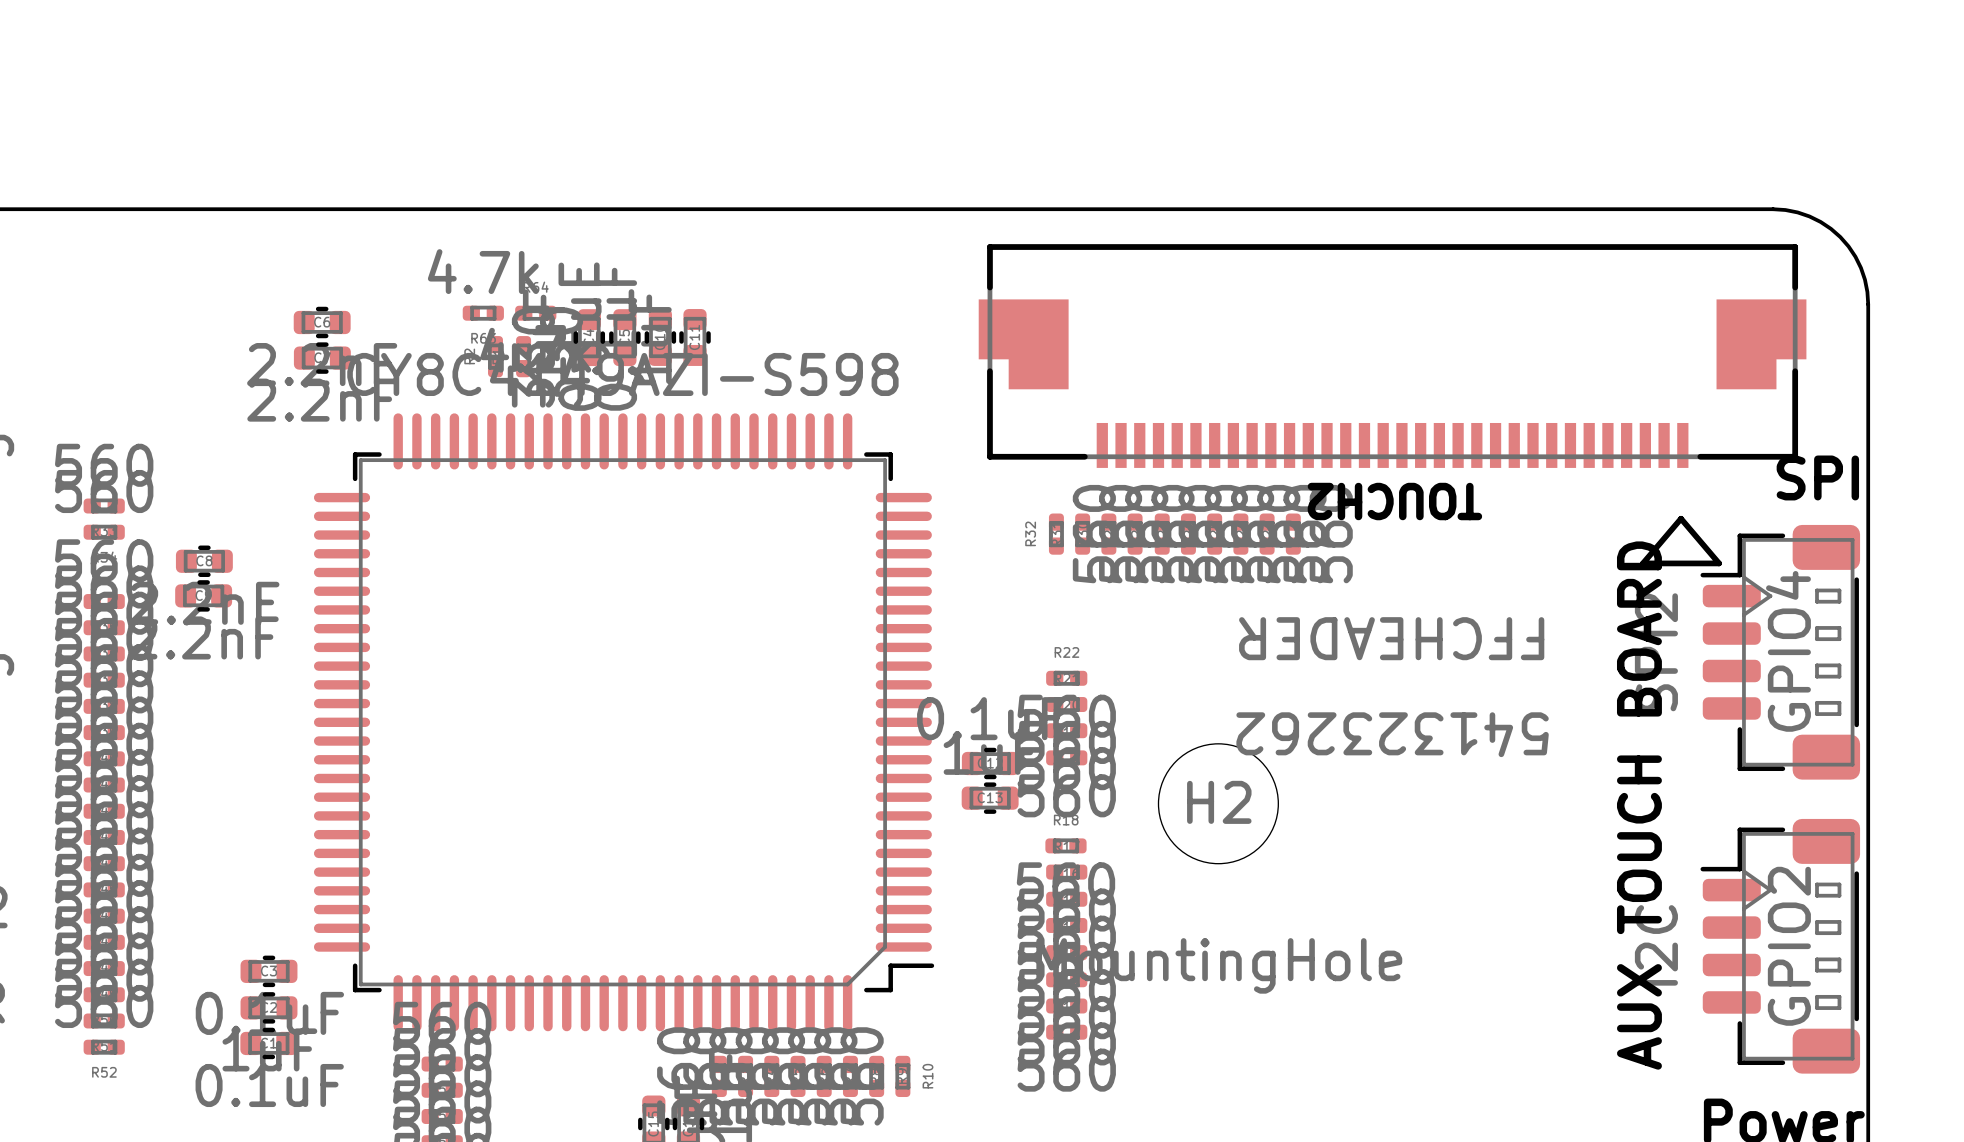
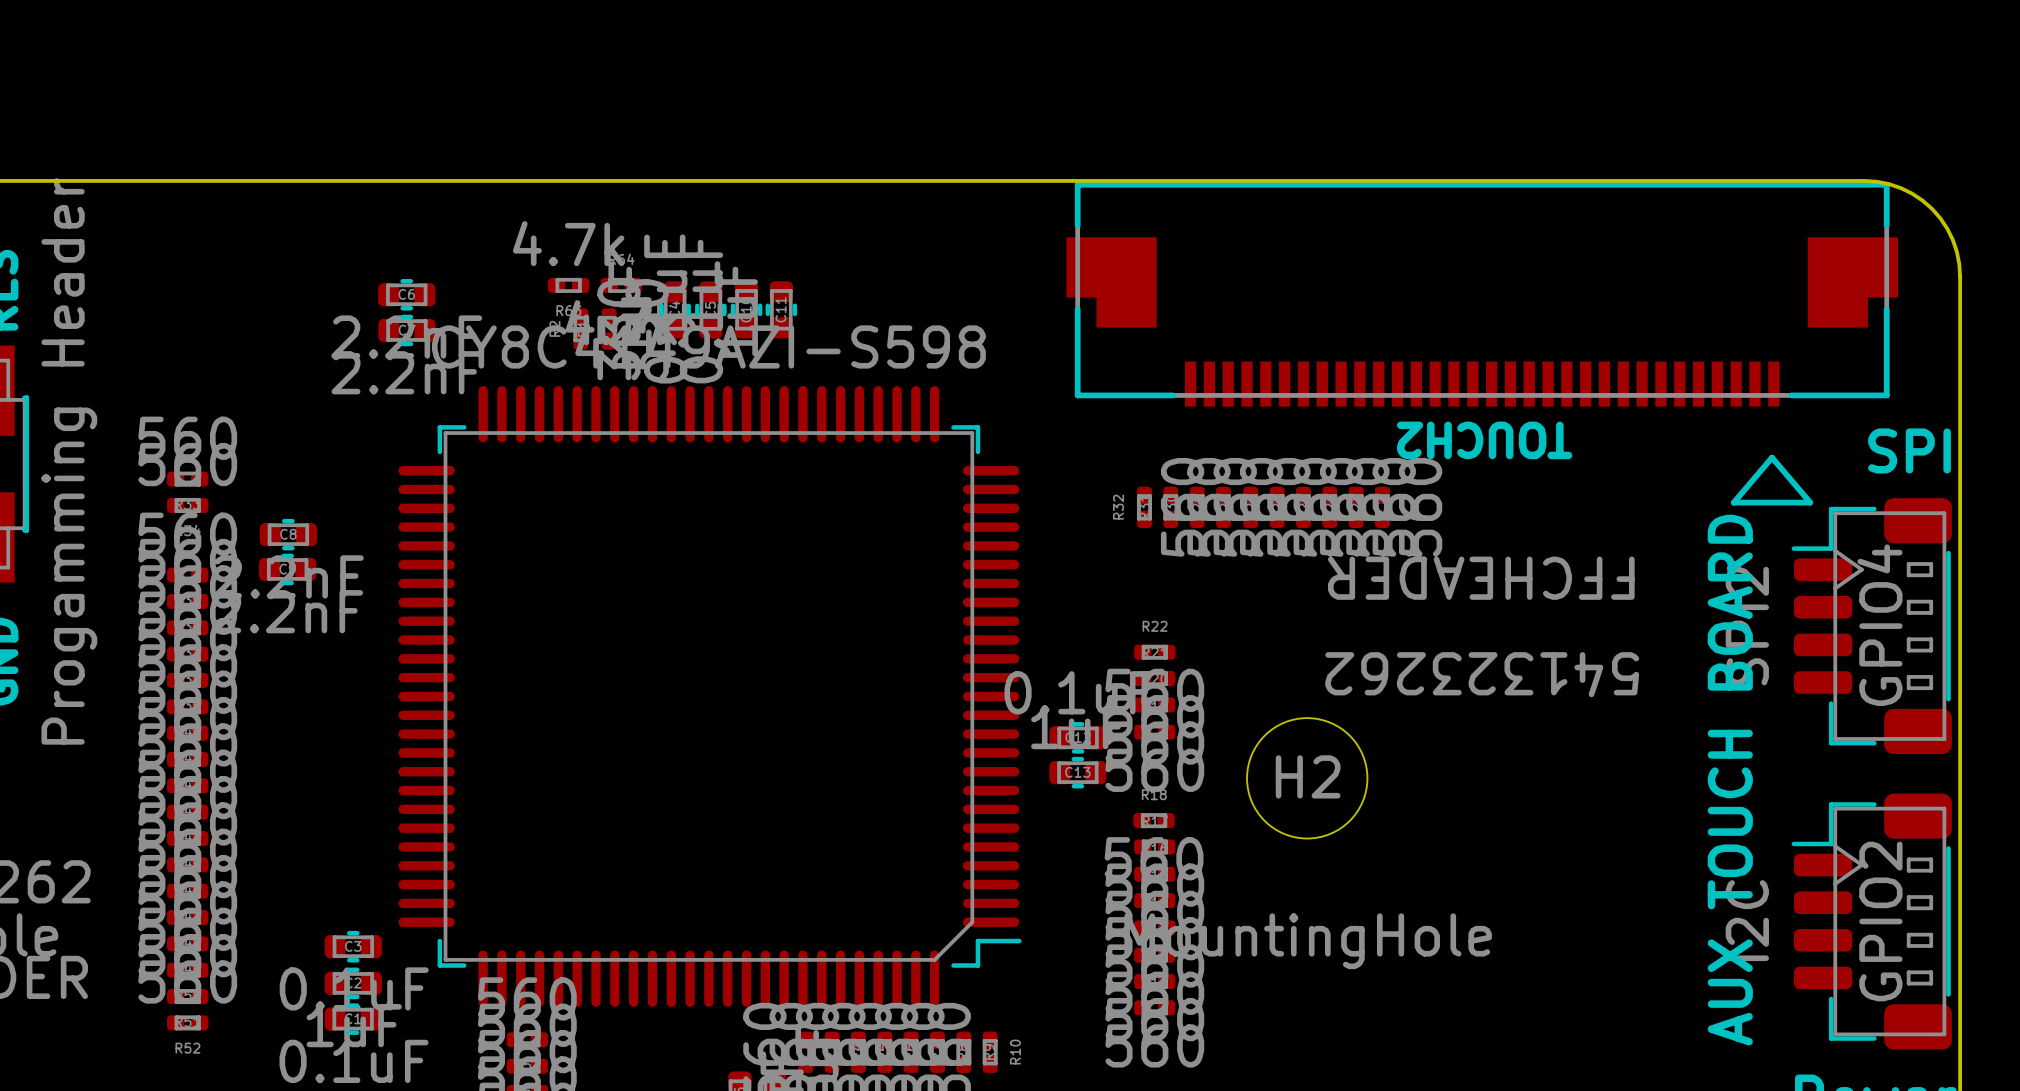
TOUCH2 position: (1392, 405) -> (1482, 343)

